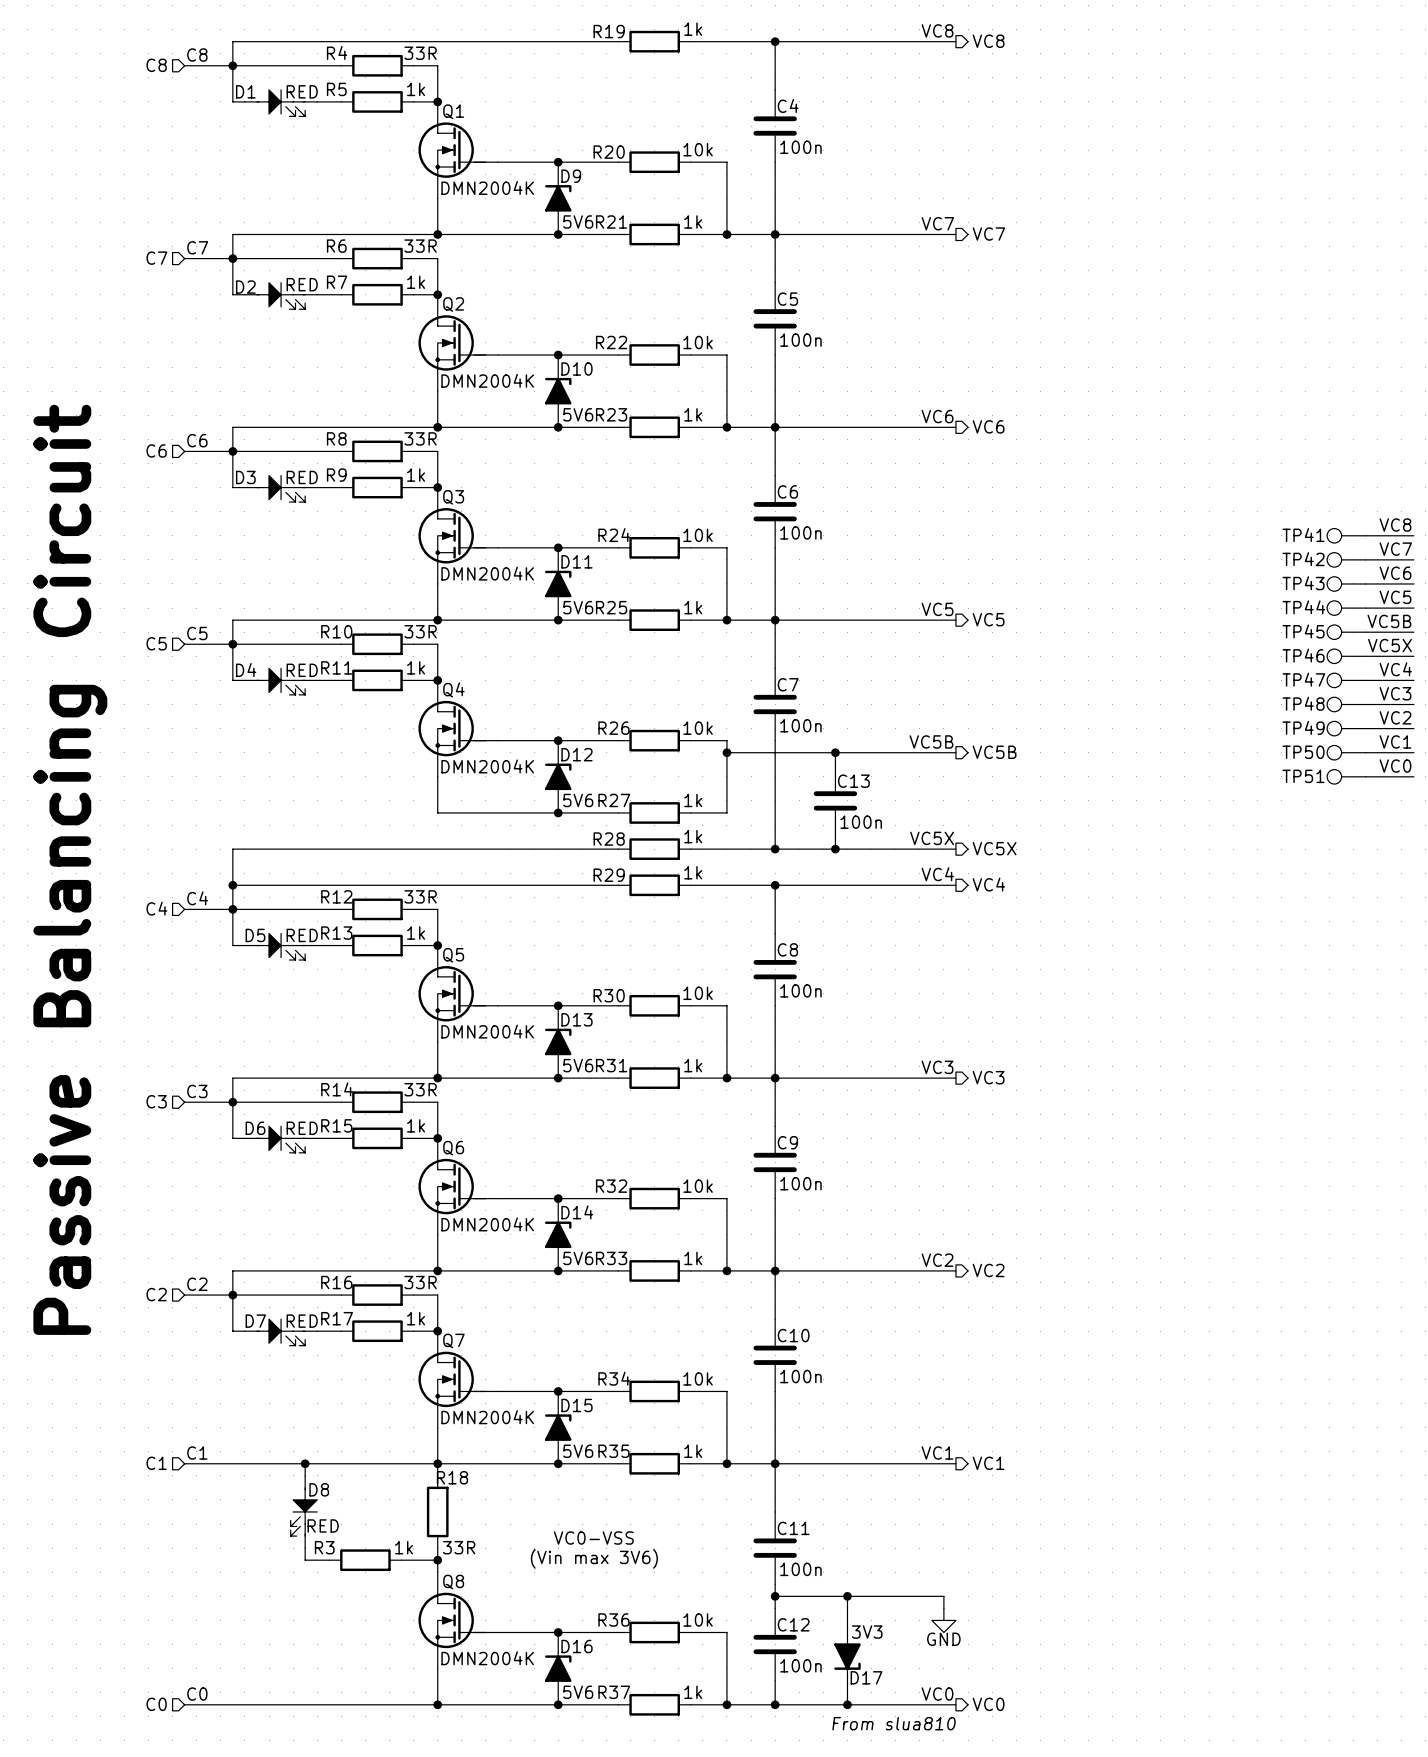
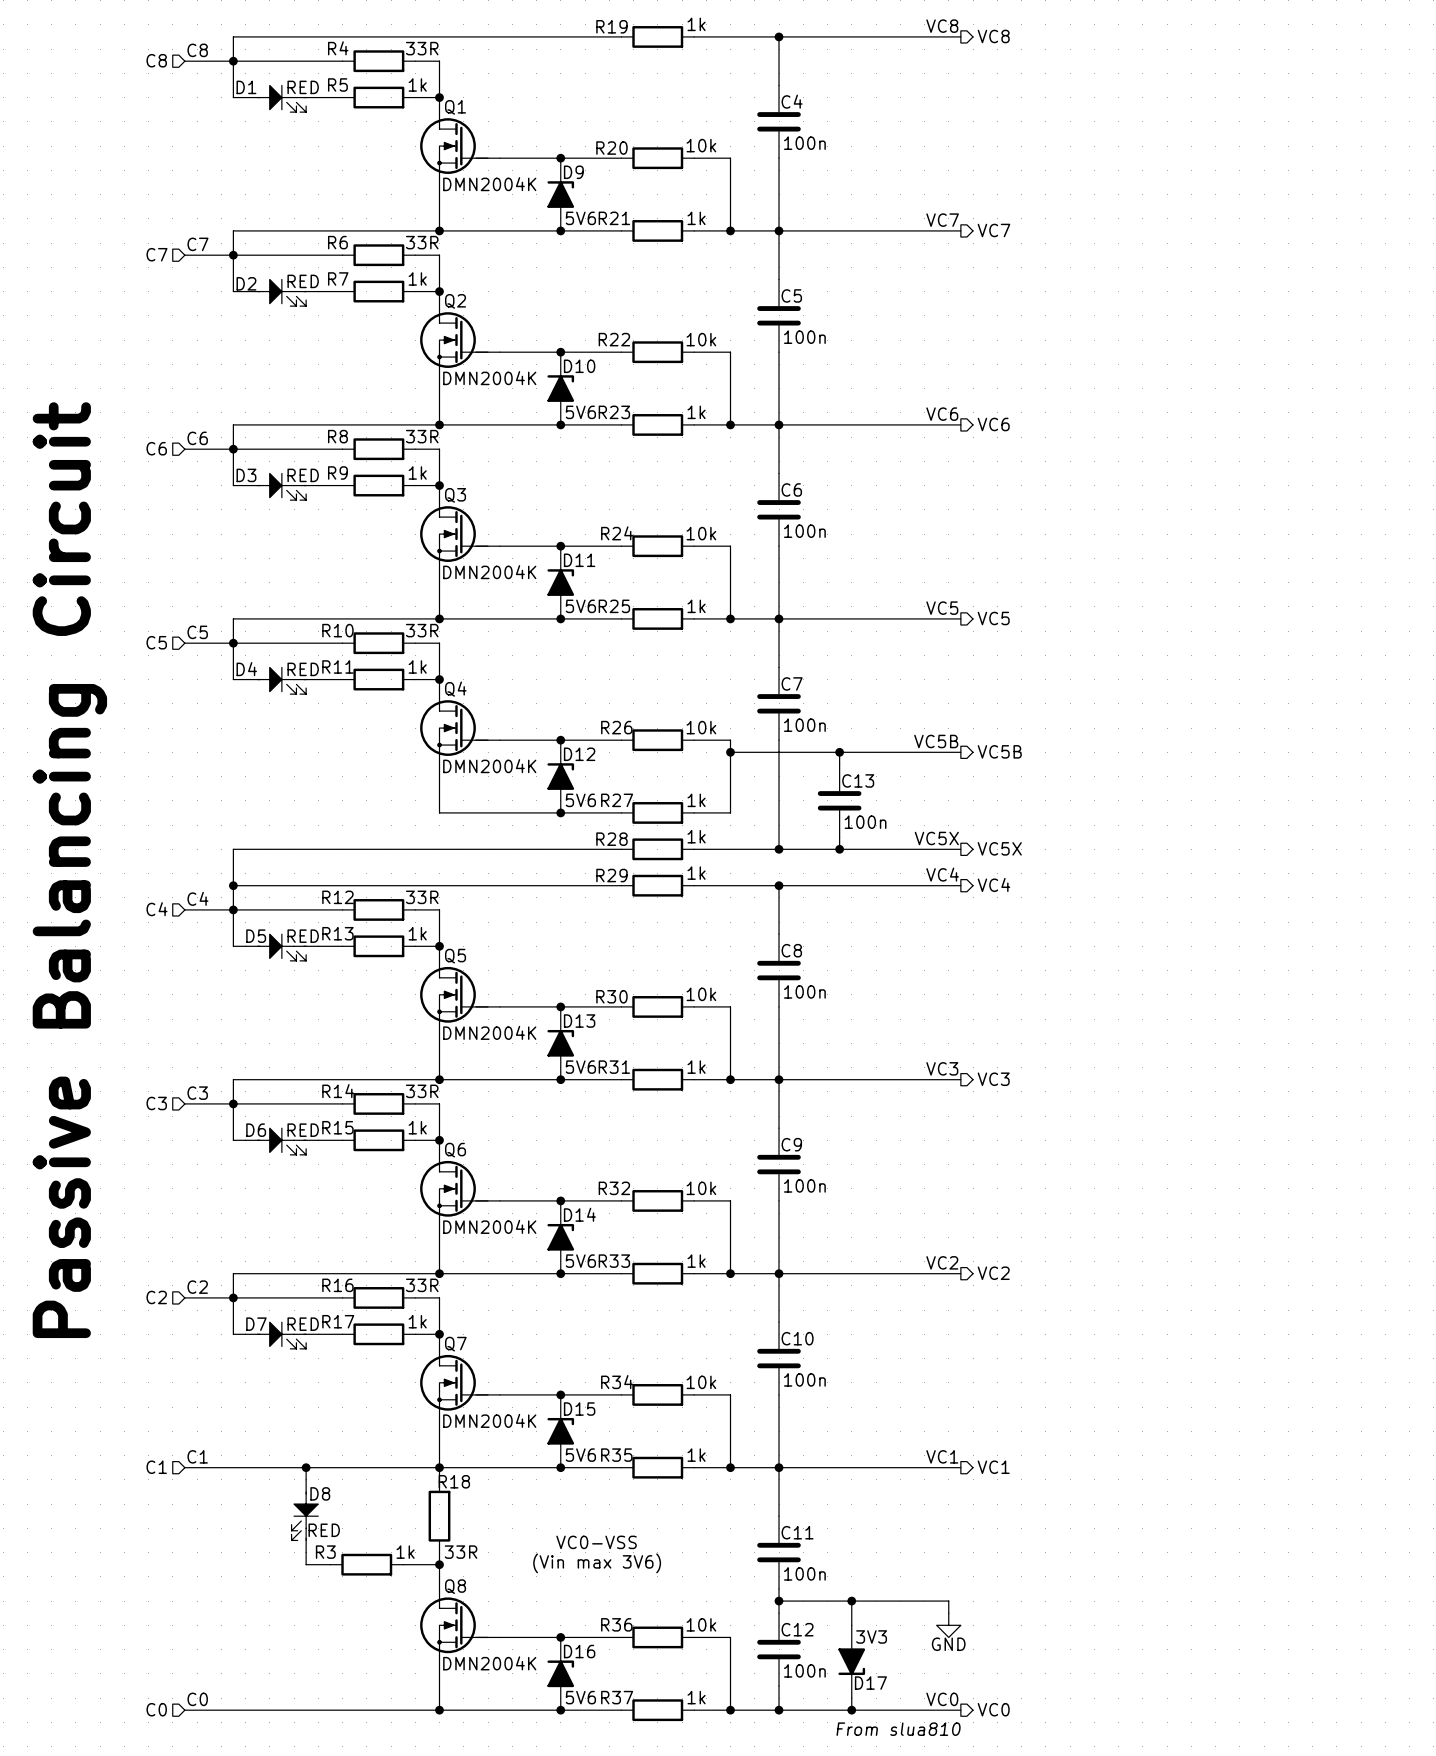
label: VC8 (1395, 525) -> none
TP41: (1346, 535) -> none
wire: (1365, 535) (1413, 535) -> none
label: VC7 (1395, 549) -> none
TP42: (1346, 559) -> none
wire: (1365, 559) (1413, 559) -> none
label: VC6 (1395, 573) -> none
TP43: (1346, 583) -> none
wire: (1365, 583) (1413, 583) -> none
label: VC5 (1395, 597) -> none
TP44: (1346, 608) -> none
wire: (1365, 608) (1413, 608) -> none
label: VC5B (1389, 621) -> none
TP45: (1346, 632) -> none
wire: (1365, 632) (1413, 632) -> none
label: VC5X (1390, 645) -> none
TP46: (1346, 656) -> none
wire: (1365, 656) (1413, 656) -> none
label: VC4 (1395, 669) -> none
TP47: (1346, 680) -> none
wire: (1365, 680) (1413, 680) -> none
label: VC3 (1395, 693) -> none
TP48: (1346, 704) -> none
wire: (1365, 704) (1413, 704) -> none
label: VC2 (1395, 717) -> none
TP49: (1346, 728) -> none
wire: (1365, 728) (1413, 728) -> none
label: VC1 (1395, 741) -> none
TP50: (1346, 752) -> none
wire: (1365, 752) (1413, 752) -> none
label: VC0 (1395, 766) -> none
TP51: (1346, 776) -> none
wire: (1365, 776) (1413, 776) -> none

